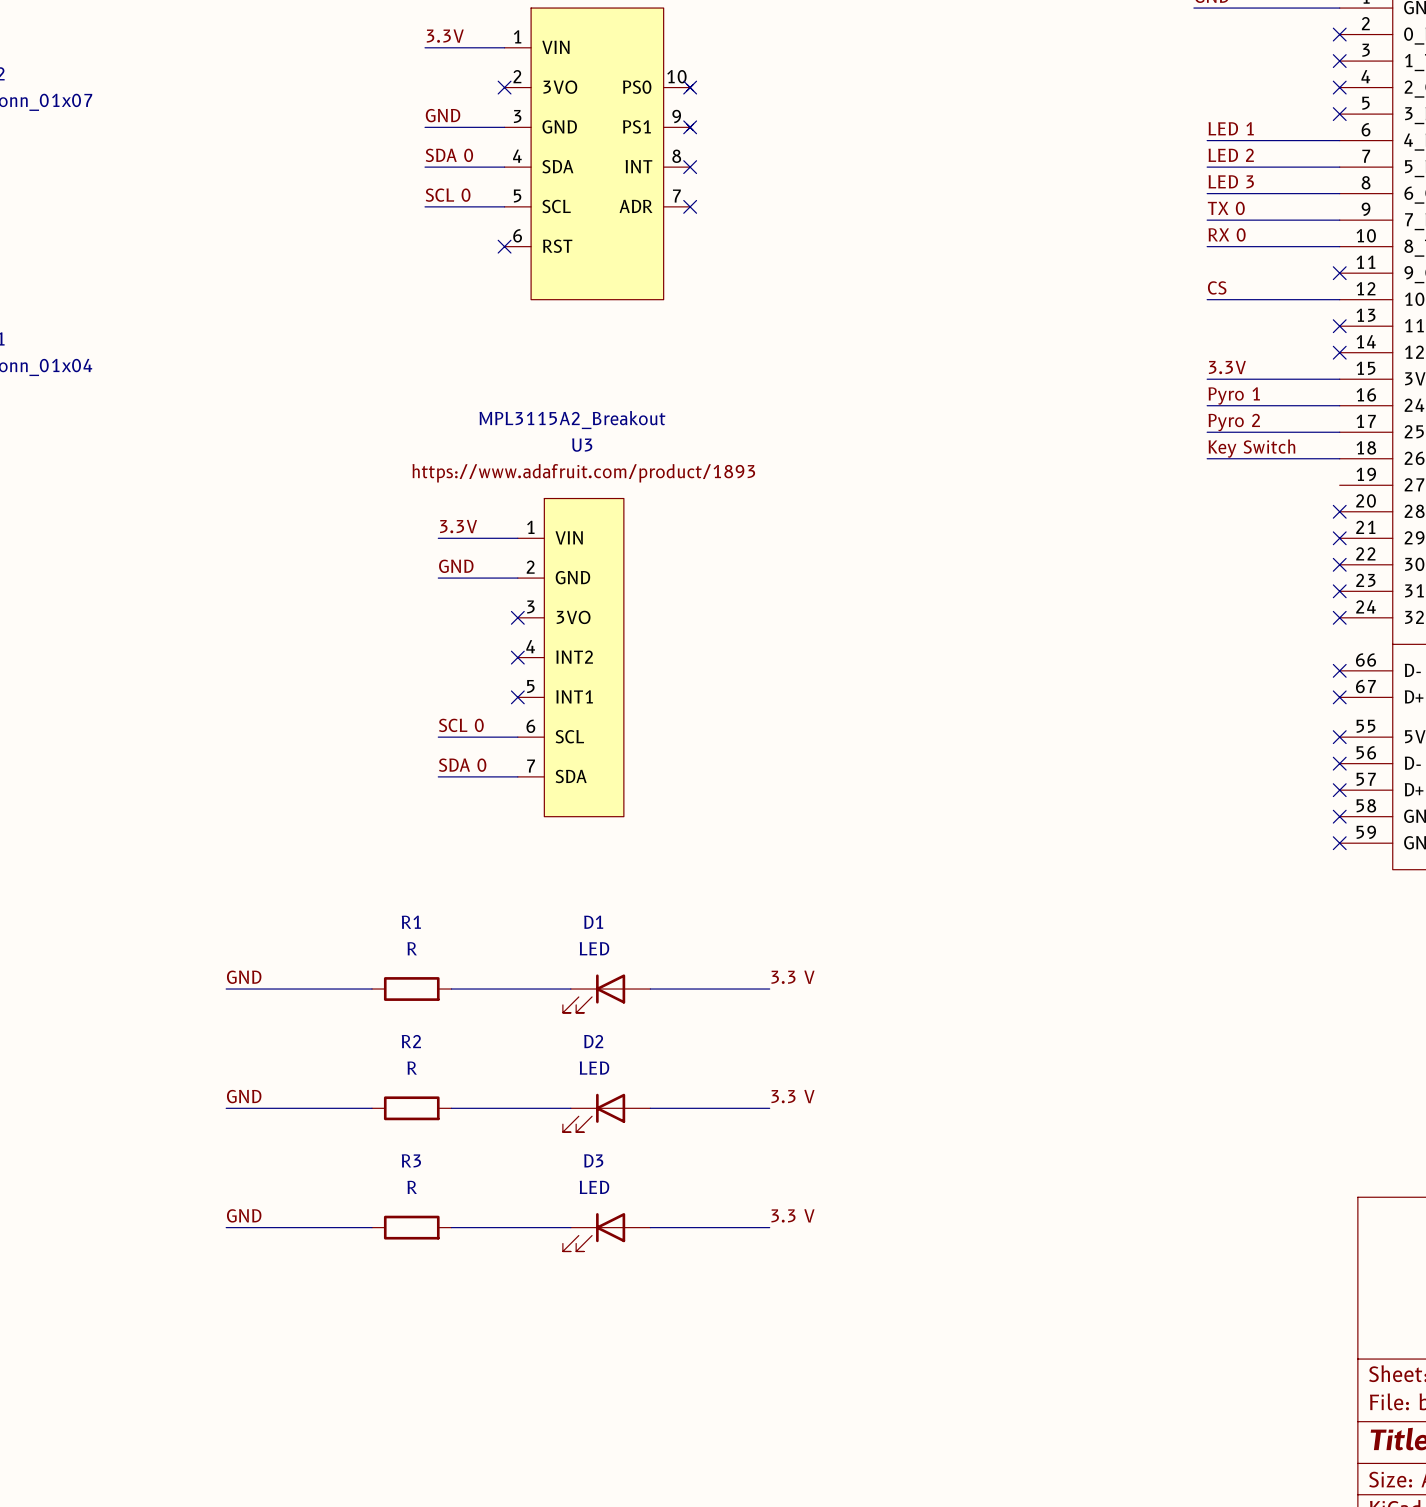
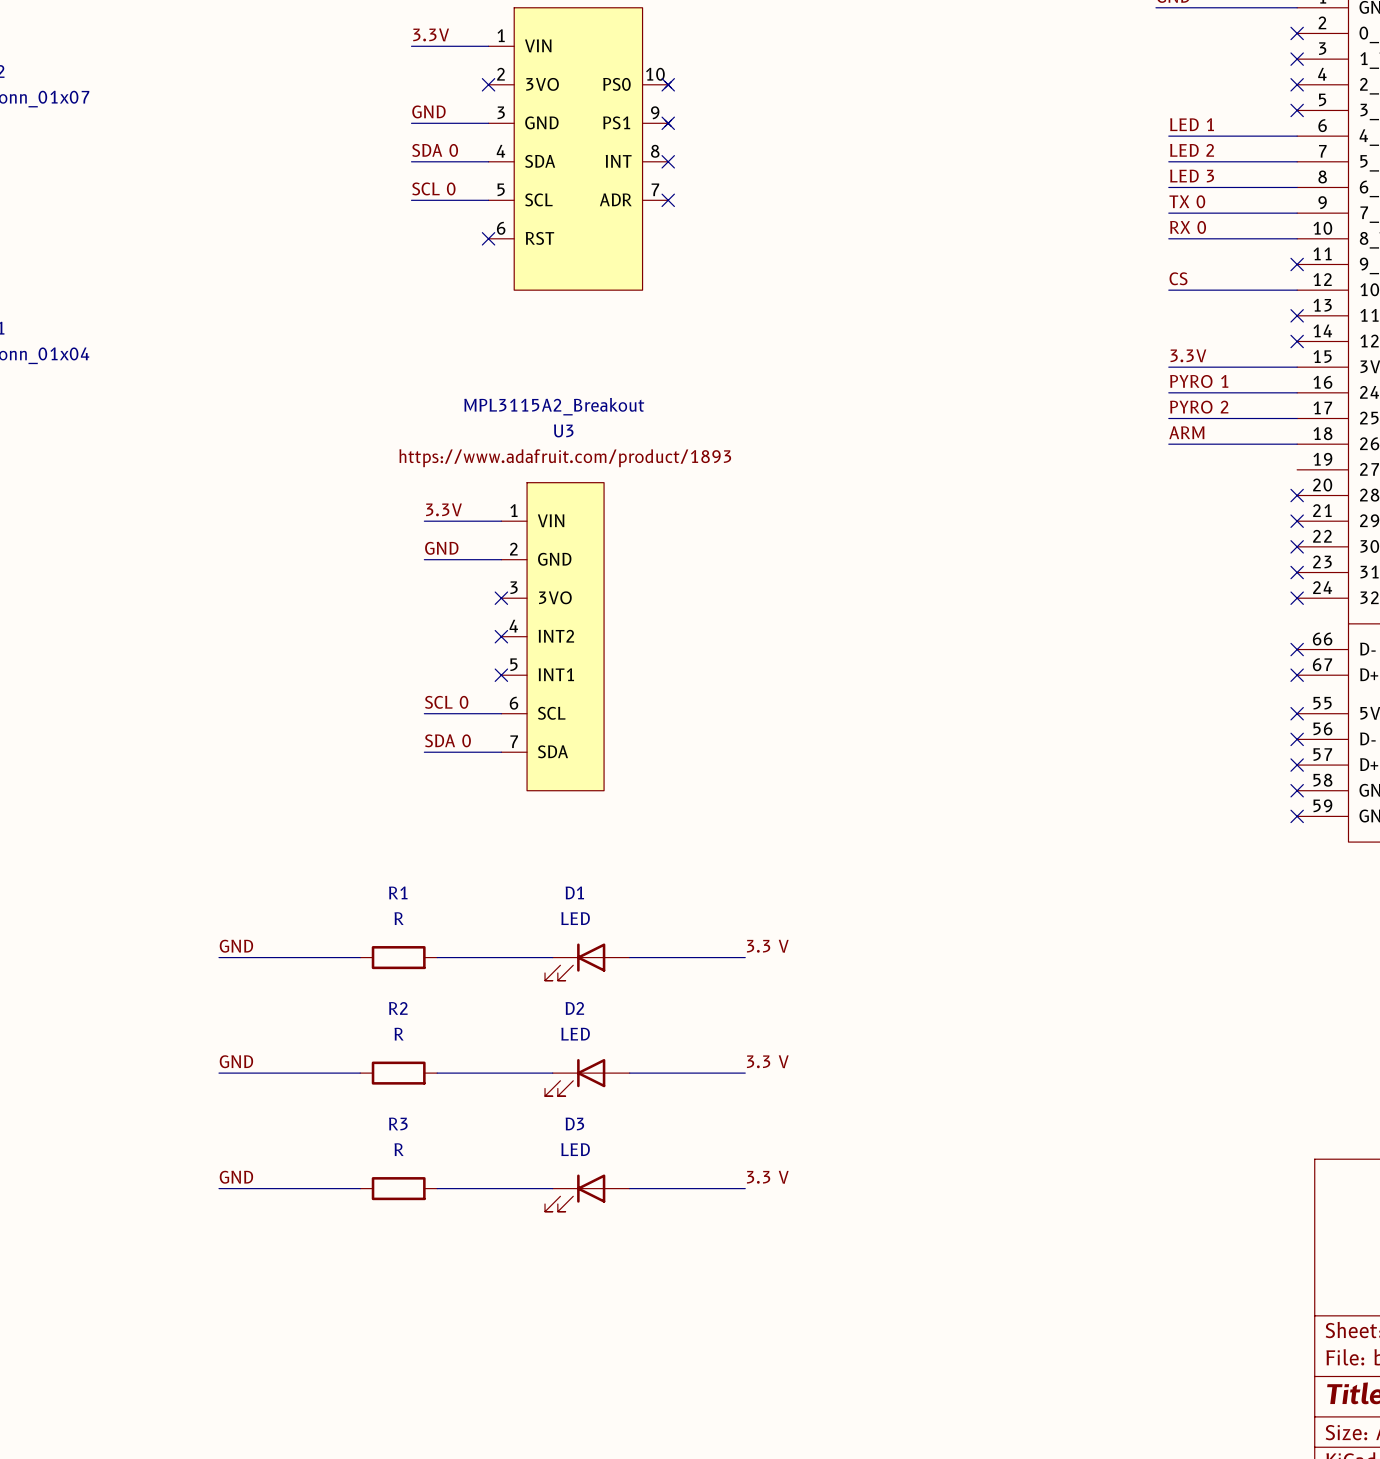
label: Pyro 1 (1234, 395) -> PYRO 1 (1199, 381)
label: Pyro 2 (1234, 422) -> PYRO 2 (1199, 407)
label: Key Switch (1251, 448) -> ARM (1186, 432)

